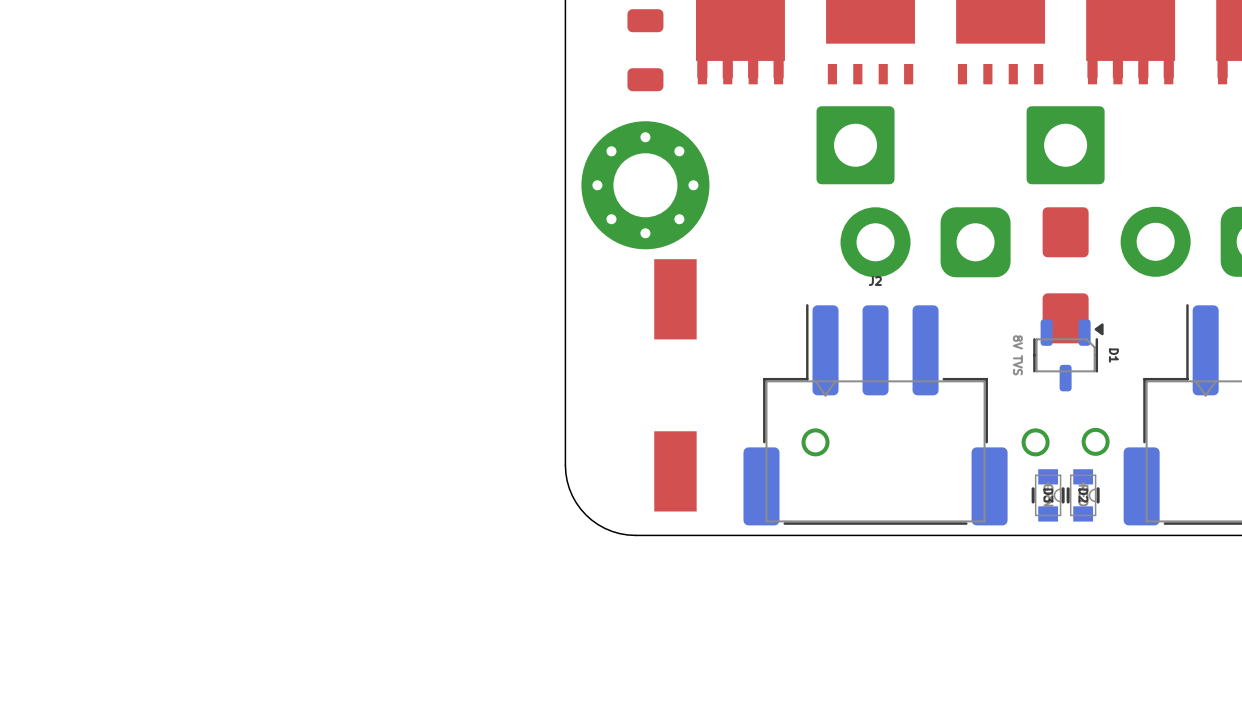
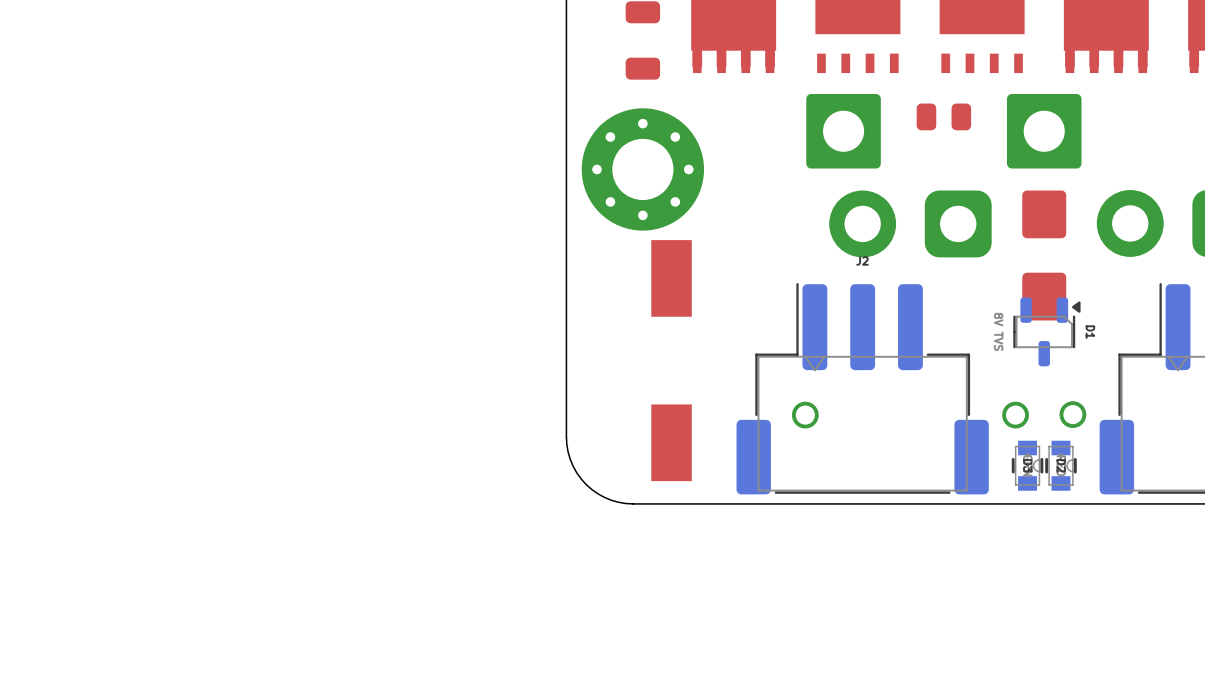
part: none -> (943, 116)

